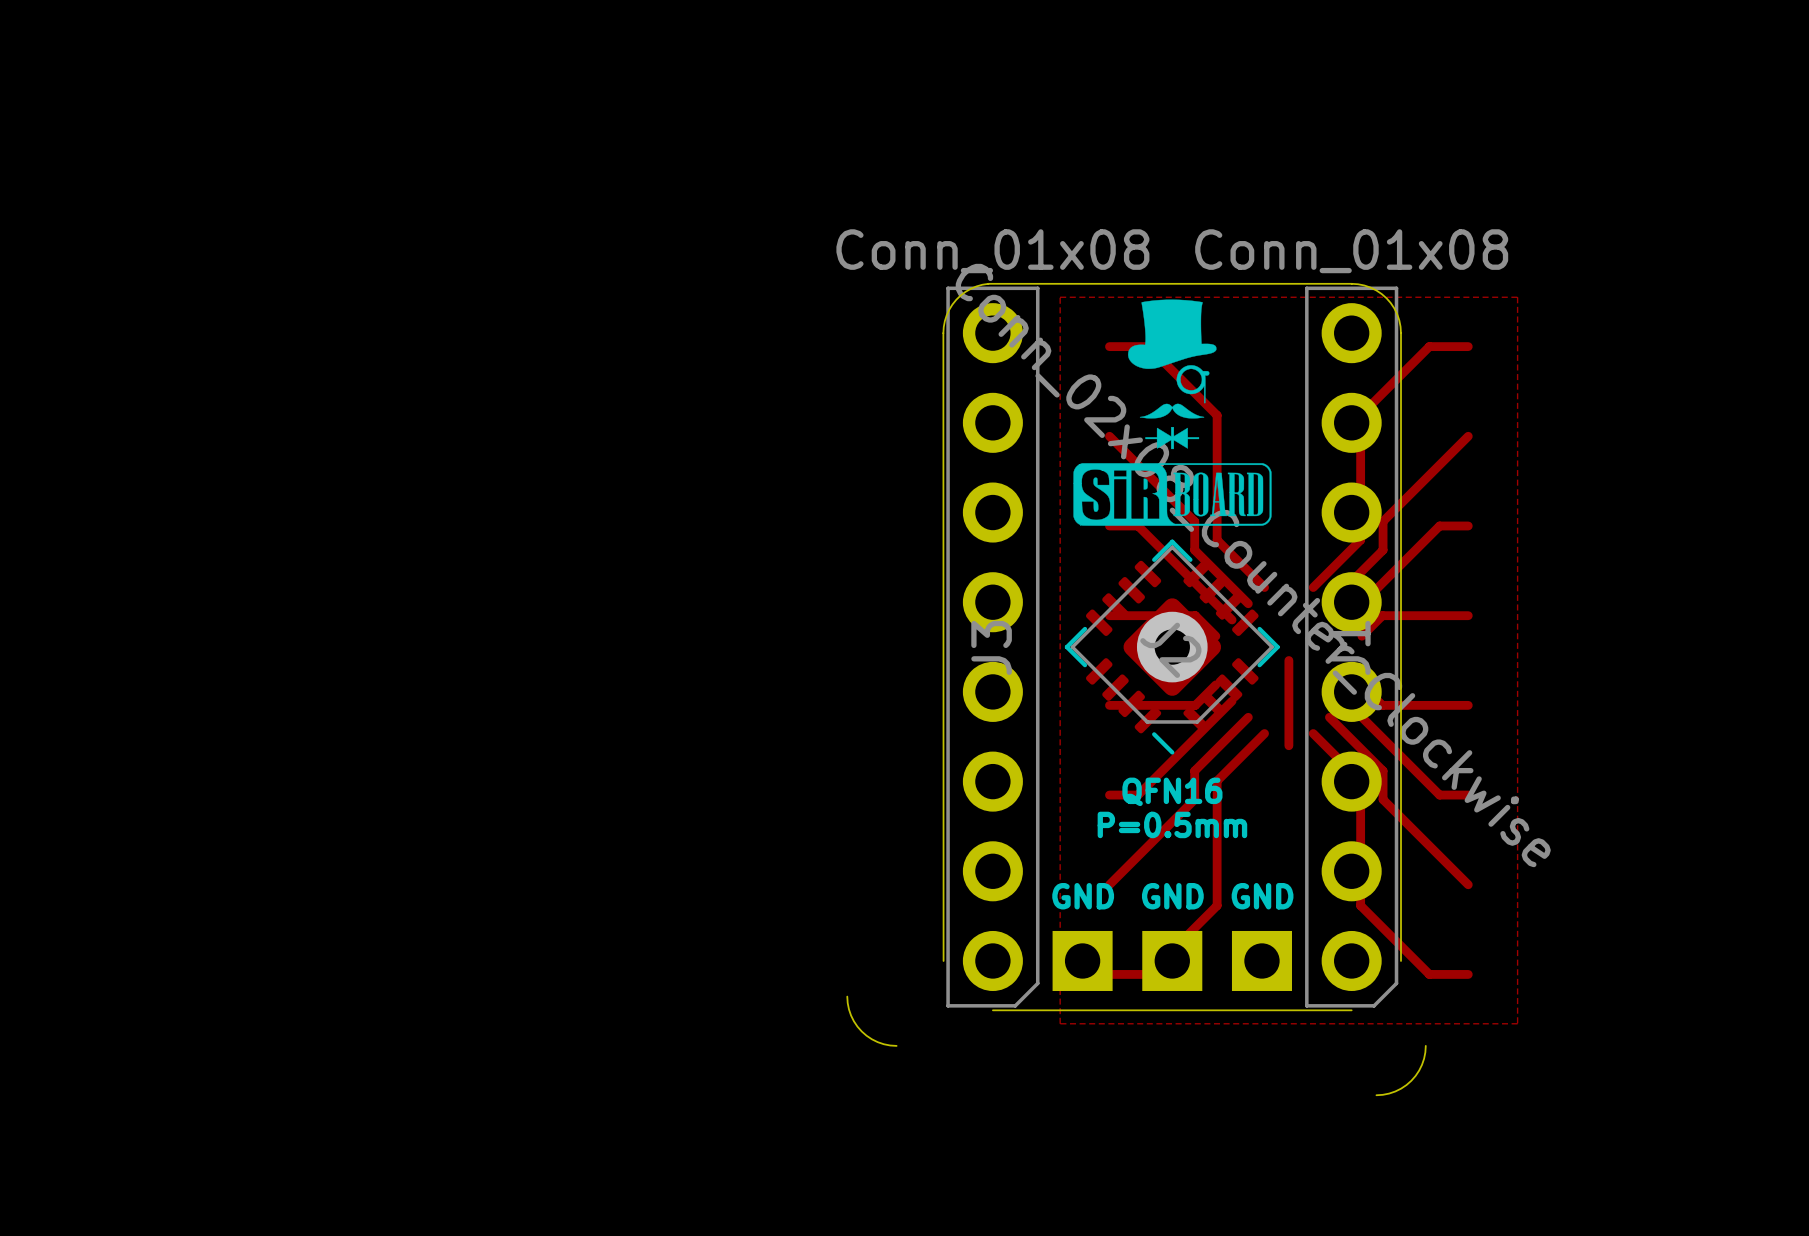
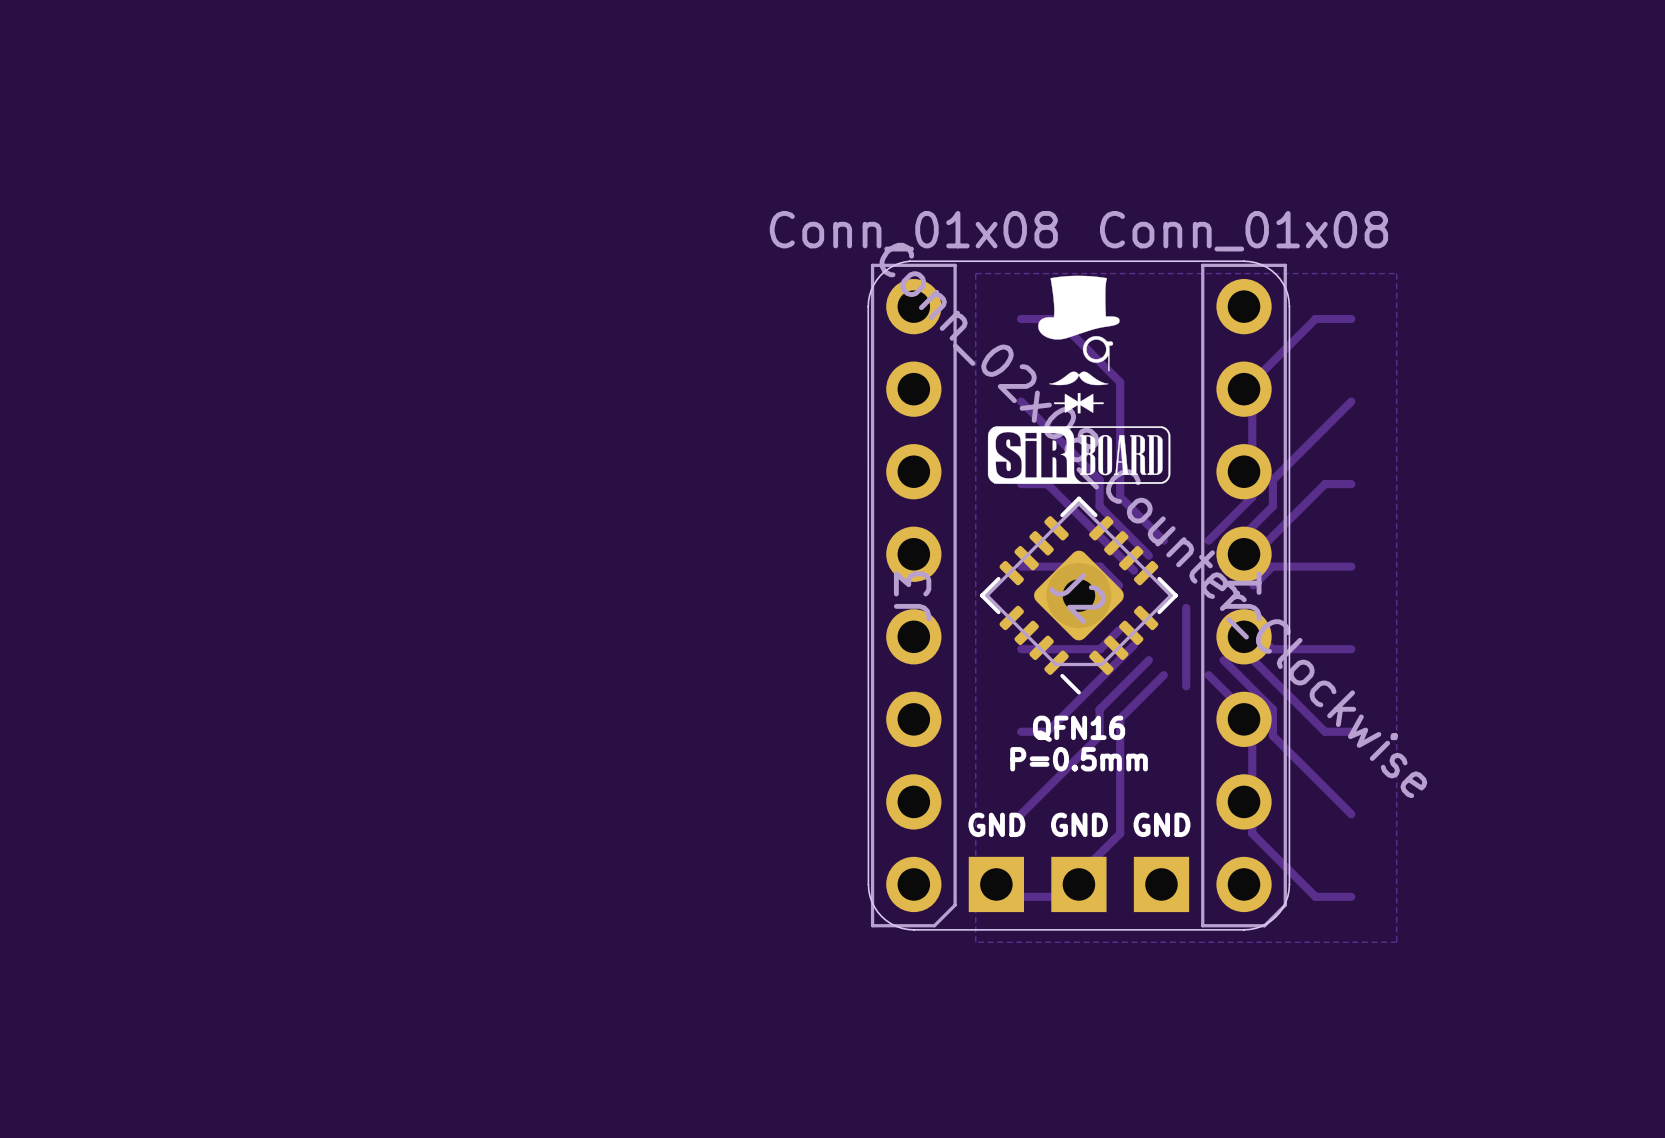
board edge: (847, 996) (851, 1015) (861, 1031) (877, 1042) (896, 1045) -> (868, 884) (871, 901) (881, 916) (896, 926) (913, 929)
board edge: (1425, 1045) (1422, 1064) (1411, 1080) (1395, 1091) (1376, 1095) -> (1289, 884) (1285, 901) (1276, 916) (1261, 926) (1244, 929)

